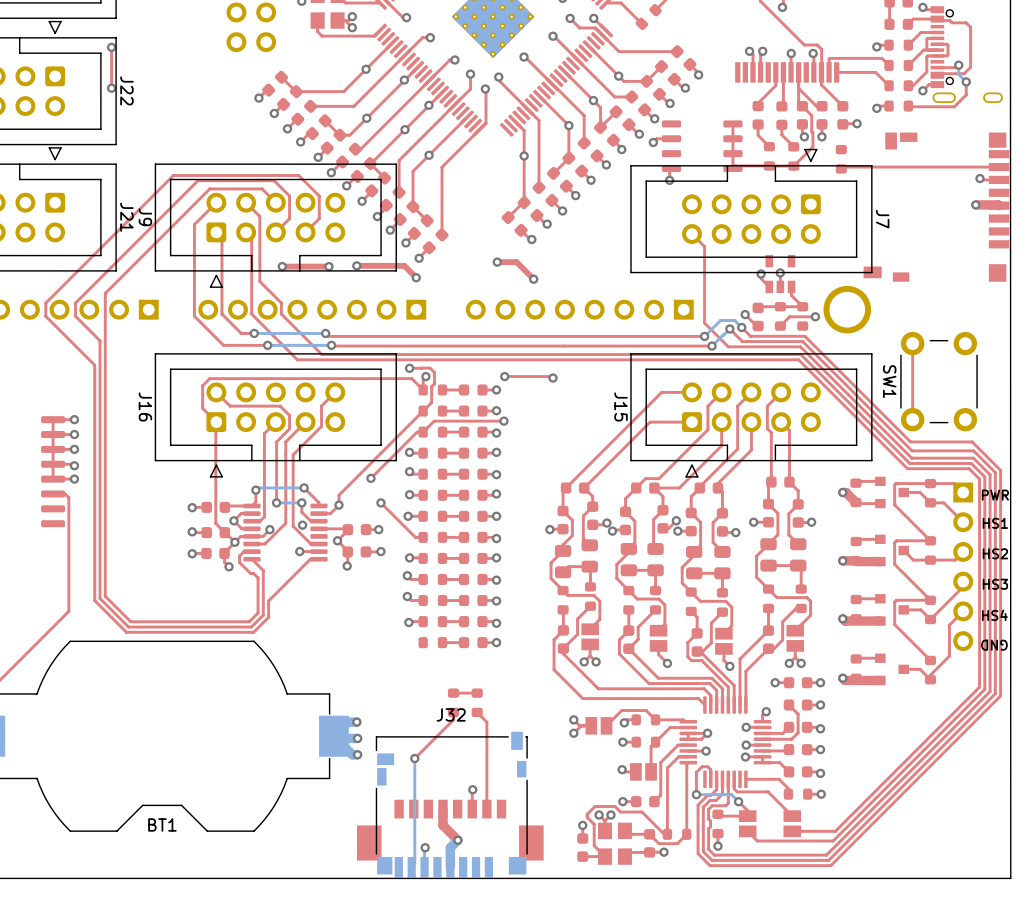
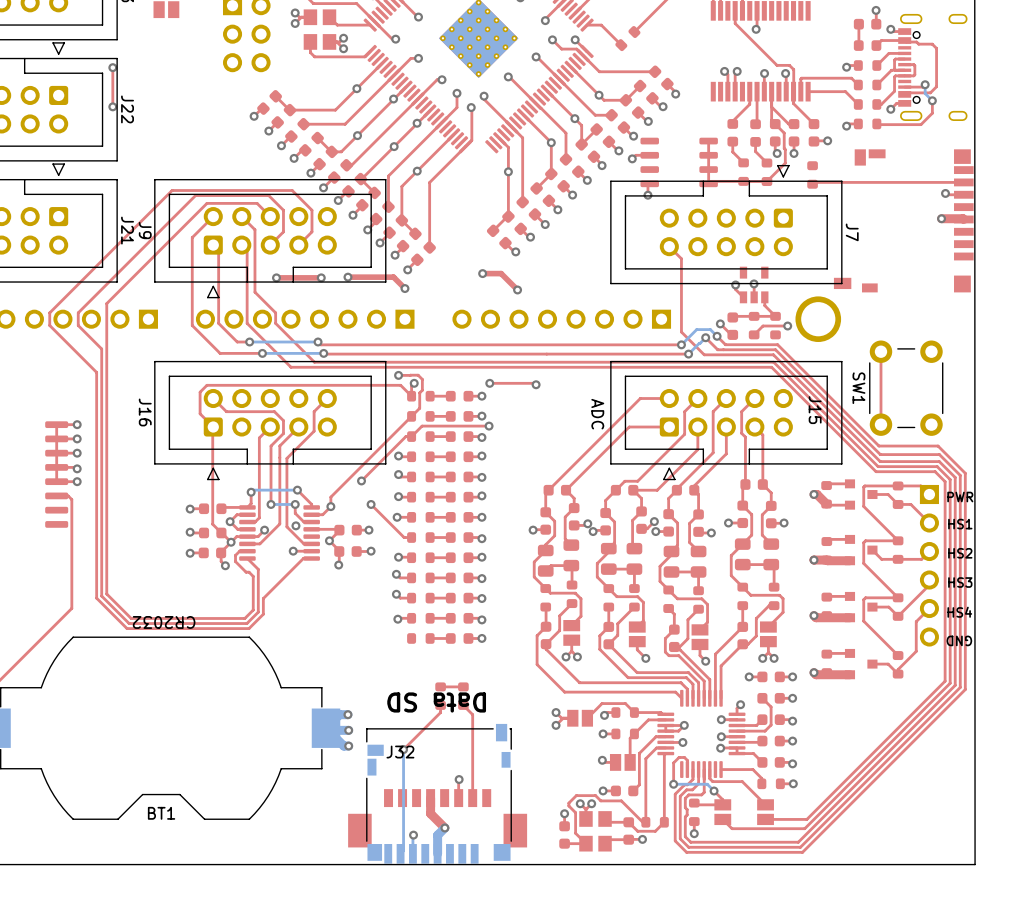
J15 name position: J15 (621, 406) -> J15 (815, 410)
text: none -> ADC (597, 414)
text: none -> CR2032 (164, 622)
text: none -> Data SD (436, 702)
J32 name position: J32 (451, 714) -> J32 (400, 752)

